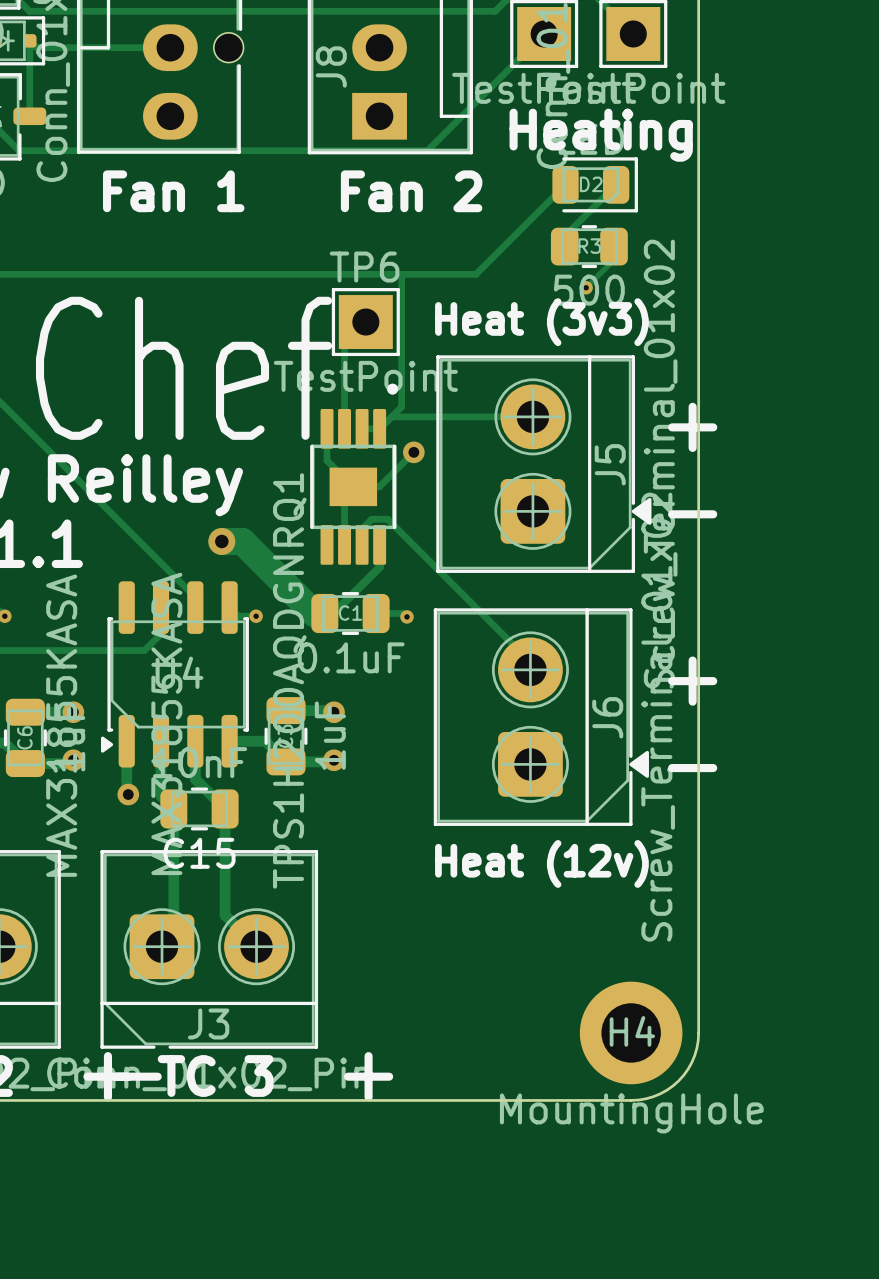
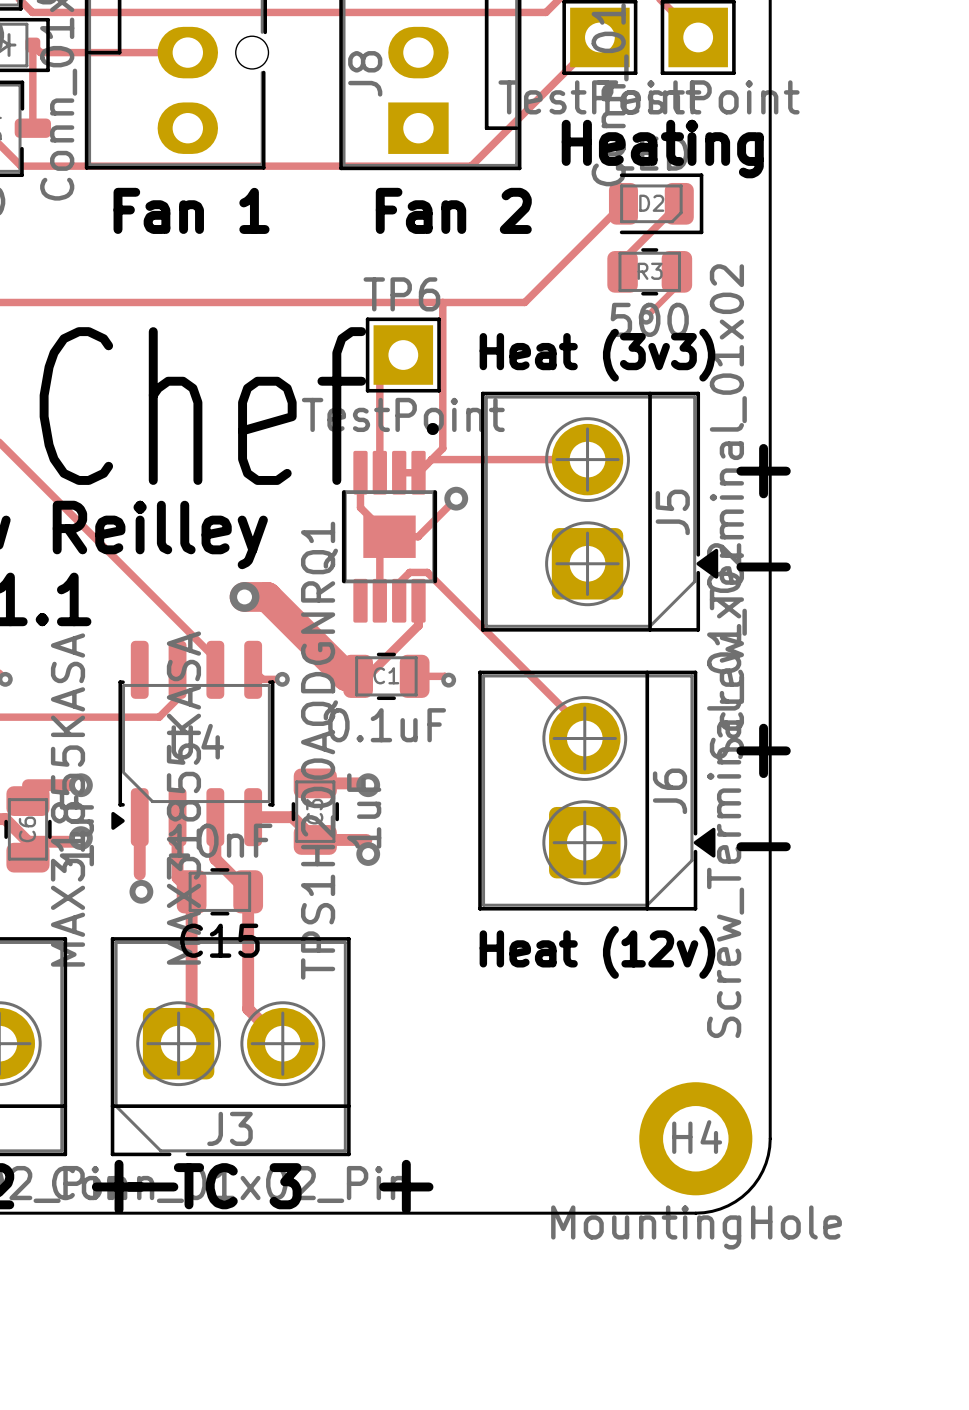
C6 position: (25, 737) -> (27, 829)
via position: (334, 760) -> (368, 854)
via position: (128, 794) -> (141, 891)

